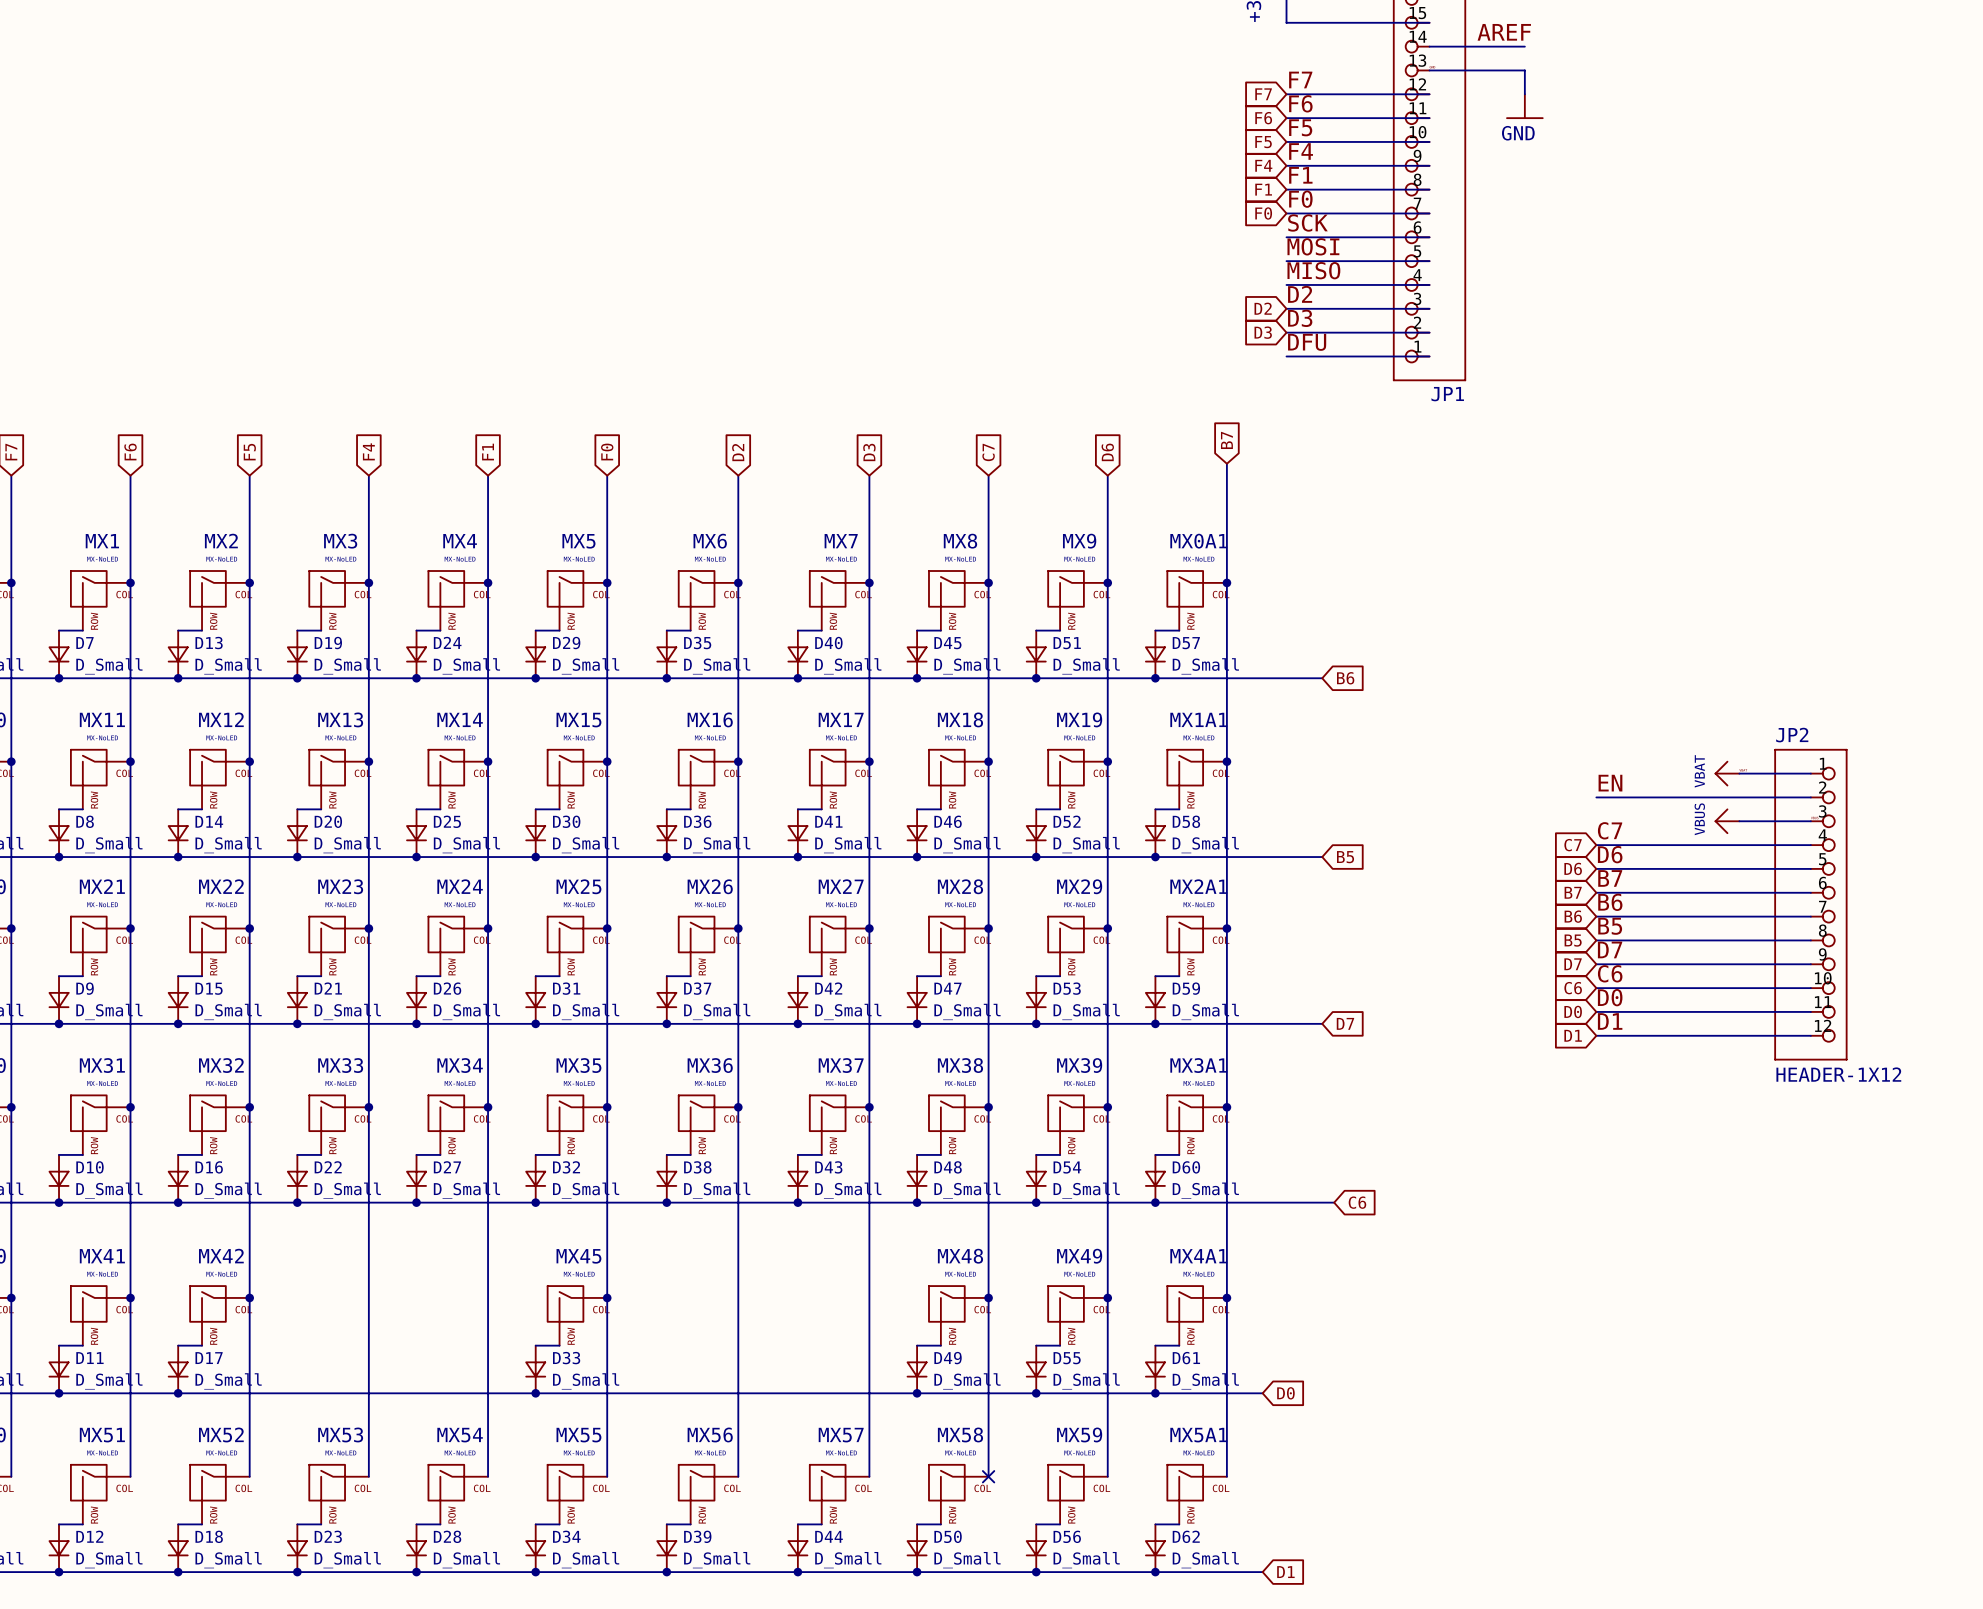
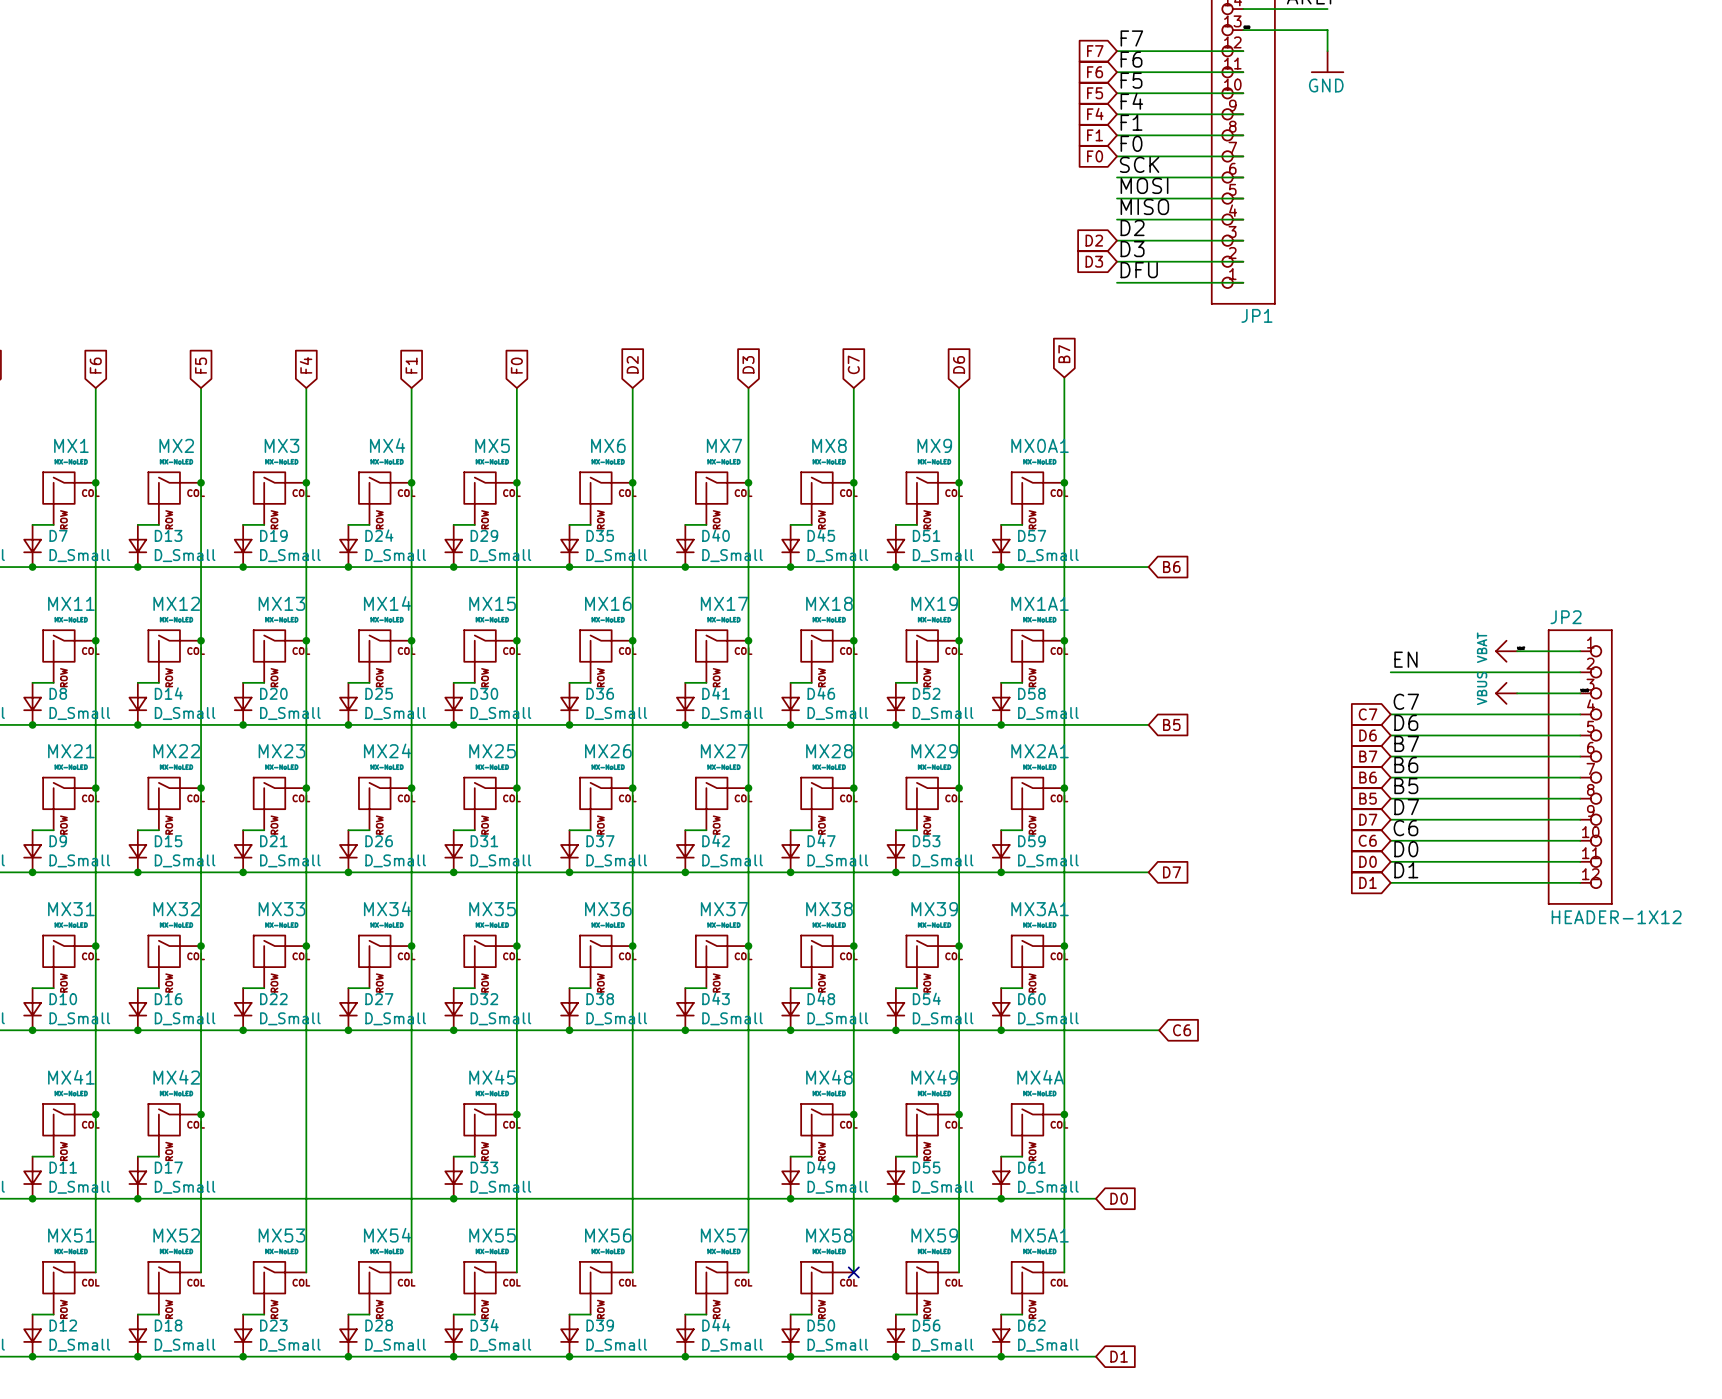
MX4A1 name: MX4A1 (1198, 1256) -> MX4A (1040, 1077)

